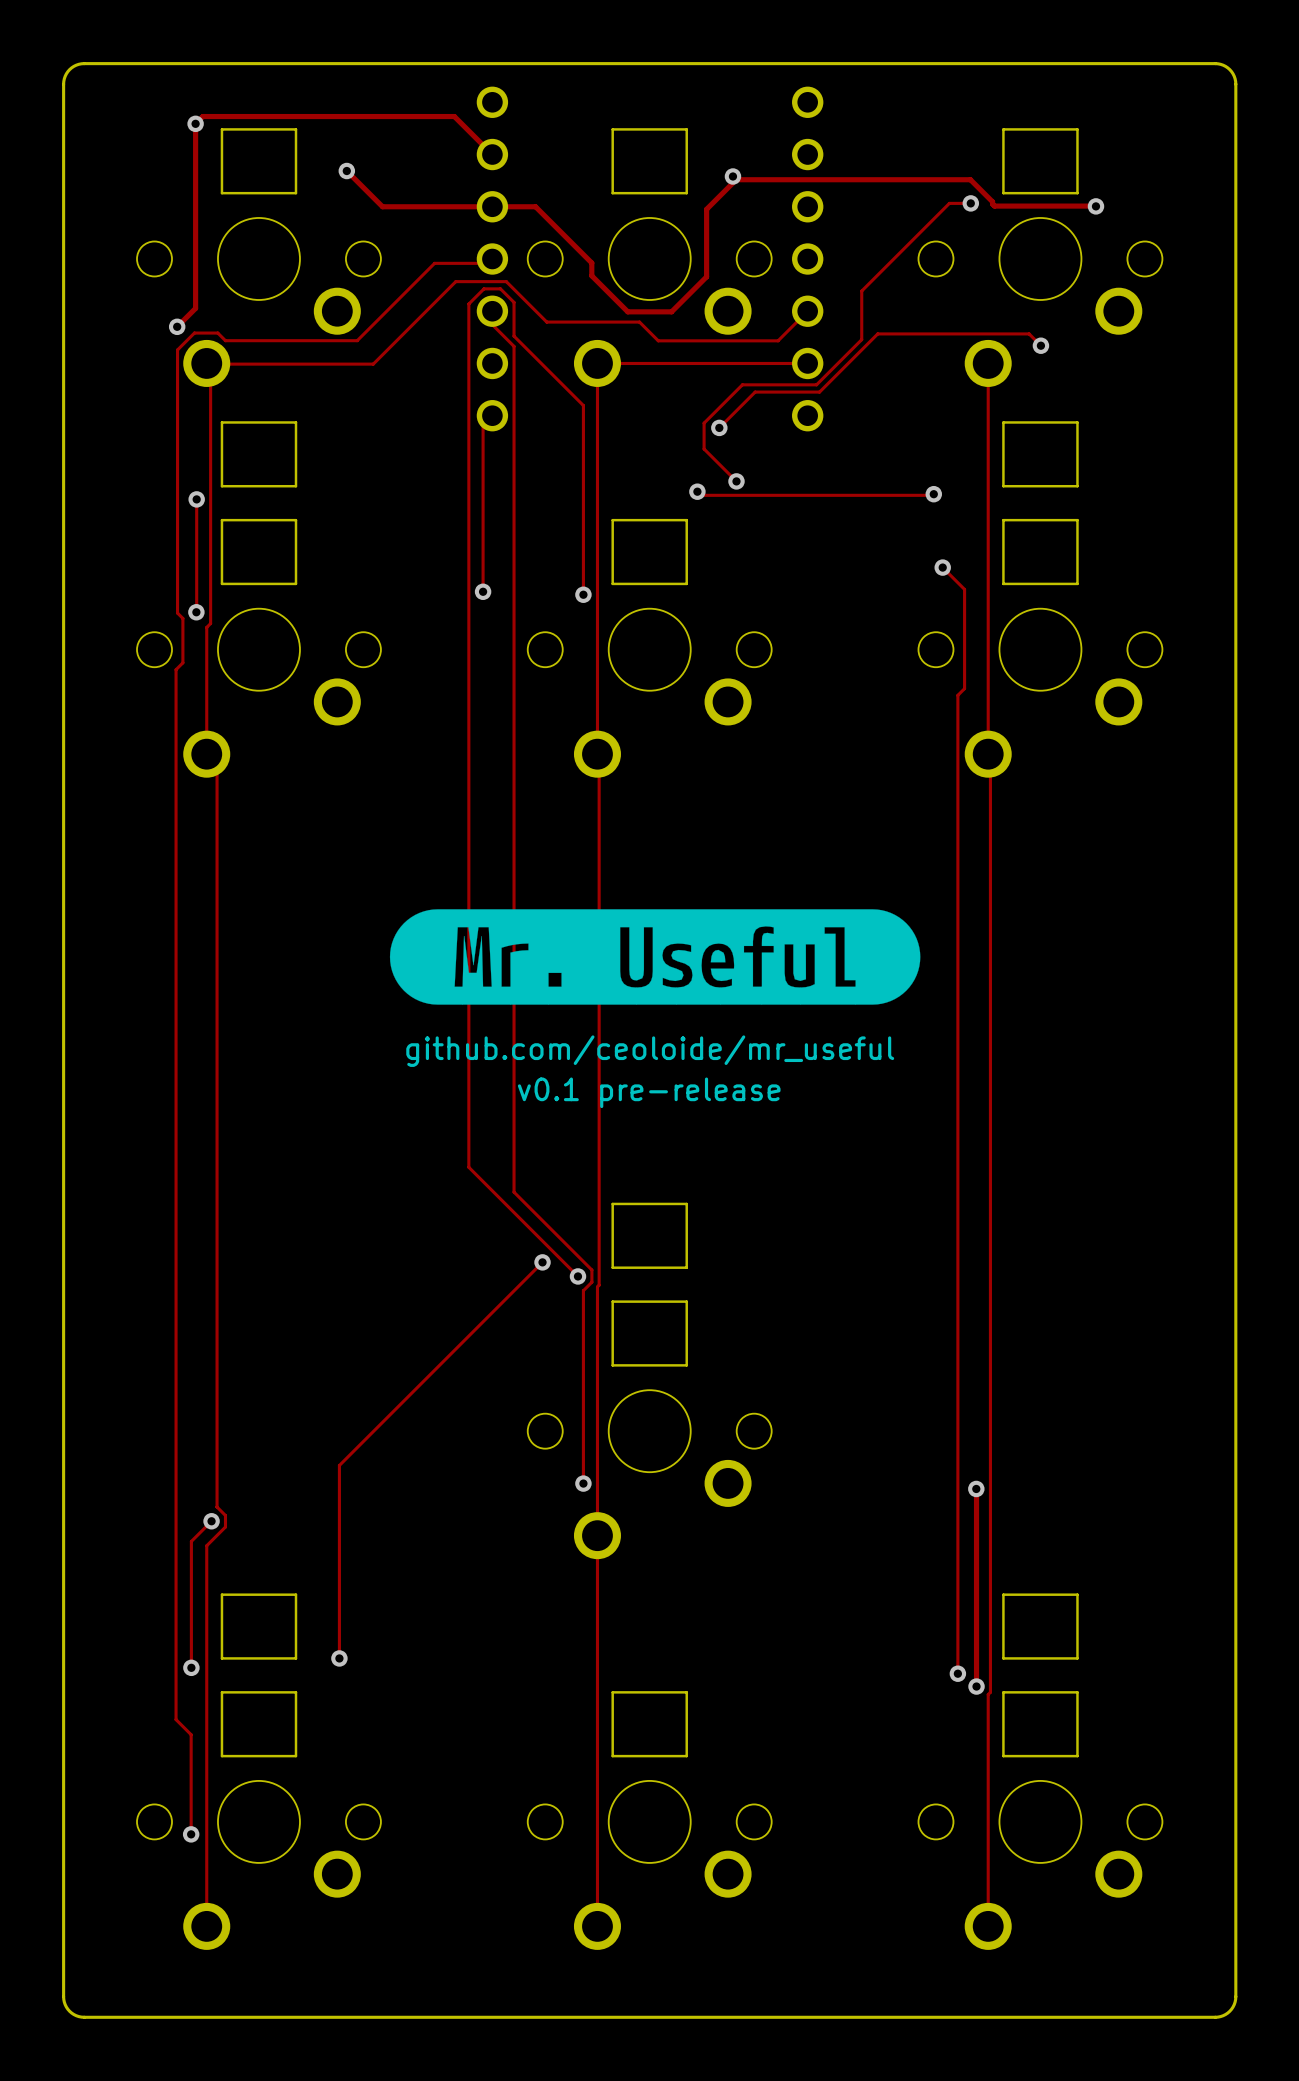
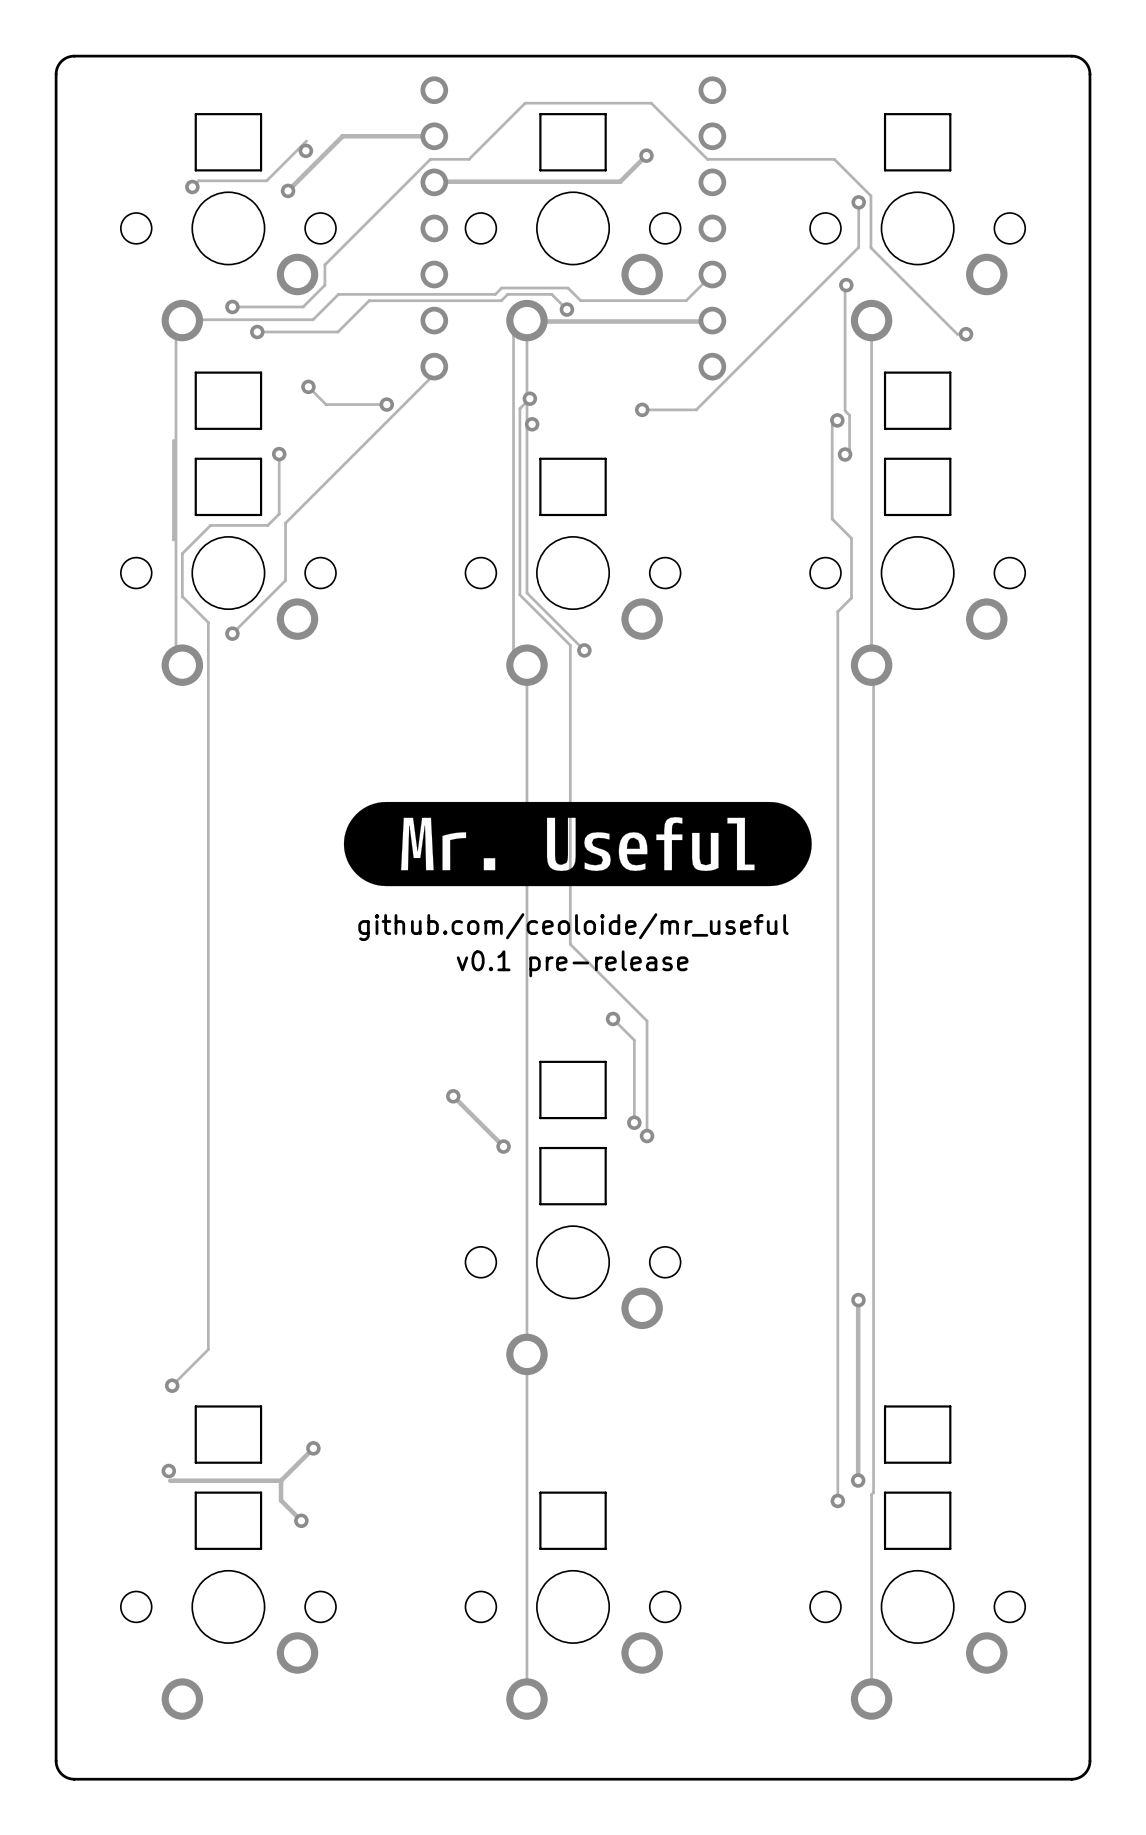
via: (195, 123) -> none
track: (492, 154) (454, 116) (202, 116) (195, 123) (195, 308) (177, 326) -> (434, 136) (342, 136) (288, 190)
track: none -> (306, 140) (266, 180) (198, 180) (192, 186)
track: (346, 171) (382, 206) (535, 206) (591, 262) (591, 275) (627, 311) (671, 311) (706, 276) (706, 209) (736, 179) (970, 179) (994, 206) (1095, 206) -> none
track: none -> (645, 156) (620, 181) (434, 182)
track: (970, 203) (949, 203) (861, 291) (861, 339) (816, 384) (742, 384) (704, 423) (704, 449) (736, 481) -> none
via position: (970, 203) -> (858, 202)
via: (1095, 206) -> none
via: none -> (192, 186)
via: none -> (288, 190)
track: none -> (858, 202) (858, 247) (696, 409) (642, 409)
track: (492, 259) (488, 263) (434, 263) (357, 340) (225, 340) (217, 333) (194, 333) (177, 349) (177, 613) (182, 618) (182, 662) (176, 669) (176, 1719) (191, 1734) (191, 1834) -> none
track: (492, 311) (492, 324) (514, 346) (514, 1192) (591, 1270) (591, 1282) (583, 1290) (583, 1483) -> none
track: none -> (846, 285) (845, 410) (849, 415) (849, 450) (845, 454)
via: none -> (846, 285)
via: (177, 326) -> none
track: (644, 326) (639, 322) (546, 322) (506, 281) (455, 281) (373, 364) (206, 363) -> (568, 288) (501, 288) (495, 294) (338, 294) (313, 319) (183, 319) (175, 326) (175, 658) (182, 665)
track: (1040, 345) (1029, 333) (877, 333) (819, 392) (755, 392) (719, 427) -> none
via: (1040, 345) -> none
track: none -> (232, 306) (303, 306) (324, 285) (324, 264) (430, 159) (469, 159) (525, 103) (651, 103) (707, 159) (834, 159) (870, 195) (870, 247) (957, 334) (966, 334)
via: none -> (232, 306)
track: none -> (566, 309) (551, 294) (507, 294) (501, 300) (369, 300) (337, 331) (257, 331)
via: none -> (566, 309)
track: (210, 364) (210, 623) (206, 627) -> (279, 454) (279, 514) (267, 525) (210, 525) (182, 553)
via: none -> (257, 331)
via: none -> (966, 334)
track: (492, 415) (483, 425) (483, 591) -> (434, 366) (434, 374) (285, 523) (285, 580) (232, 633)
via: (719, 427) -> none
track: none -> (308, 386) (326, 404) (386, 404)
via: none -> (308, 386)
track: none -> (529, 398) (519, 408) (519, 594) (570, 645) (570, 944) (647, 1021) (647, 1136)
via: none -> (529, 398)
via: none -> (386, 404)
track: none -> (837, 420) (832, 425) (832, 519) (851, 538) (851, 598) (837, 611) (837, 1500)
via: none -> (837, 420)
via: none -> (532, 424)
via position: (736, 481) -> (642, 409)
track: (697, 491) (701, 495) (933, 494) -> none
via: (697, 491) -> none
via: (933, 494) -> none
via: (196, 499) -> none
via: none -> (279, 454)
via: none -> (845, 454)
track: (942, 567) (964, 589) (964, 688) (957, 695) (957, 1673) -> none
via: (942, 567) -> none
via: (483, 591) -> none
track: (583, 594) (583, 405) (514, 336) (514, 302) (500, 288) (484, 288) (468, 304) (468, 1167) (577, 1276) -> none
via: (583, 594) -> none
via: (196, 612) -> none
track: (597, 672) (599, 1285) (597, 1286) -> (712, 320) (710, 322) (526, 322) (513, 335) (513, 651) (526, 665) (526, 1135)
track: none -> (526, 593) (584, 650)
track: (206, 676) (206, 754) (217, 764) (217, 1507) (225, 1515) (225, 1527) (206, 1545) (206, 1926) -> (182, 596) (208, 622) (208, 1349) (172, 1385)
via: none -> (232, 633)
via: none -> (584, 650)
track: none -> (613, 1018) (634, 1040) (634, 1122)
via: none -> (613, 1018)
track: none -> (453, 1096) (503, 1146)
via: none -> (453, 1096)
track: (542, 1262) (339, 1465) (339, 1658) -> none
via: (542, 1262) -> none
via: none -> (634, 1122)
via: (577, 1276) -> none
via: none -> (647, 1136)
via: none -> (503, 1146)
track: none -> (858, 1300) (858, 1480)
via: (583, 1483) -> none
via position: (976, 1488) -> (858, 1300)
track: (976, 1489) (976, 1686) -> none
track: (211, 1521) (191, 1541) (191, 1667) -> none
via position: (211, 1521) -> (172, 1385)
track: none -> (313, 1448) (281, 1480)
via position: (339, 1658) -> (313, 1448)
via: (957, 1673) -> none
track: none -> (170, 1480) (281, 1480)
track: none -> (281, 1480) (281, 1500) (301, 1520)
via: none -> (858, 1480)
via: (976, 1686) -> none
via: none -> (837, 1500)
via: none -> (301, 1520)
via: (191, 1834) -> none

